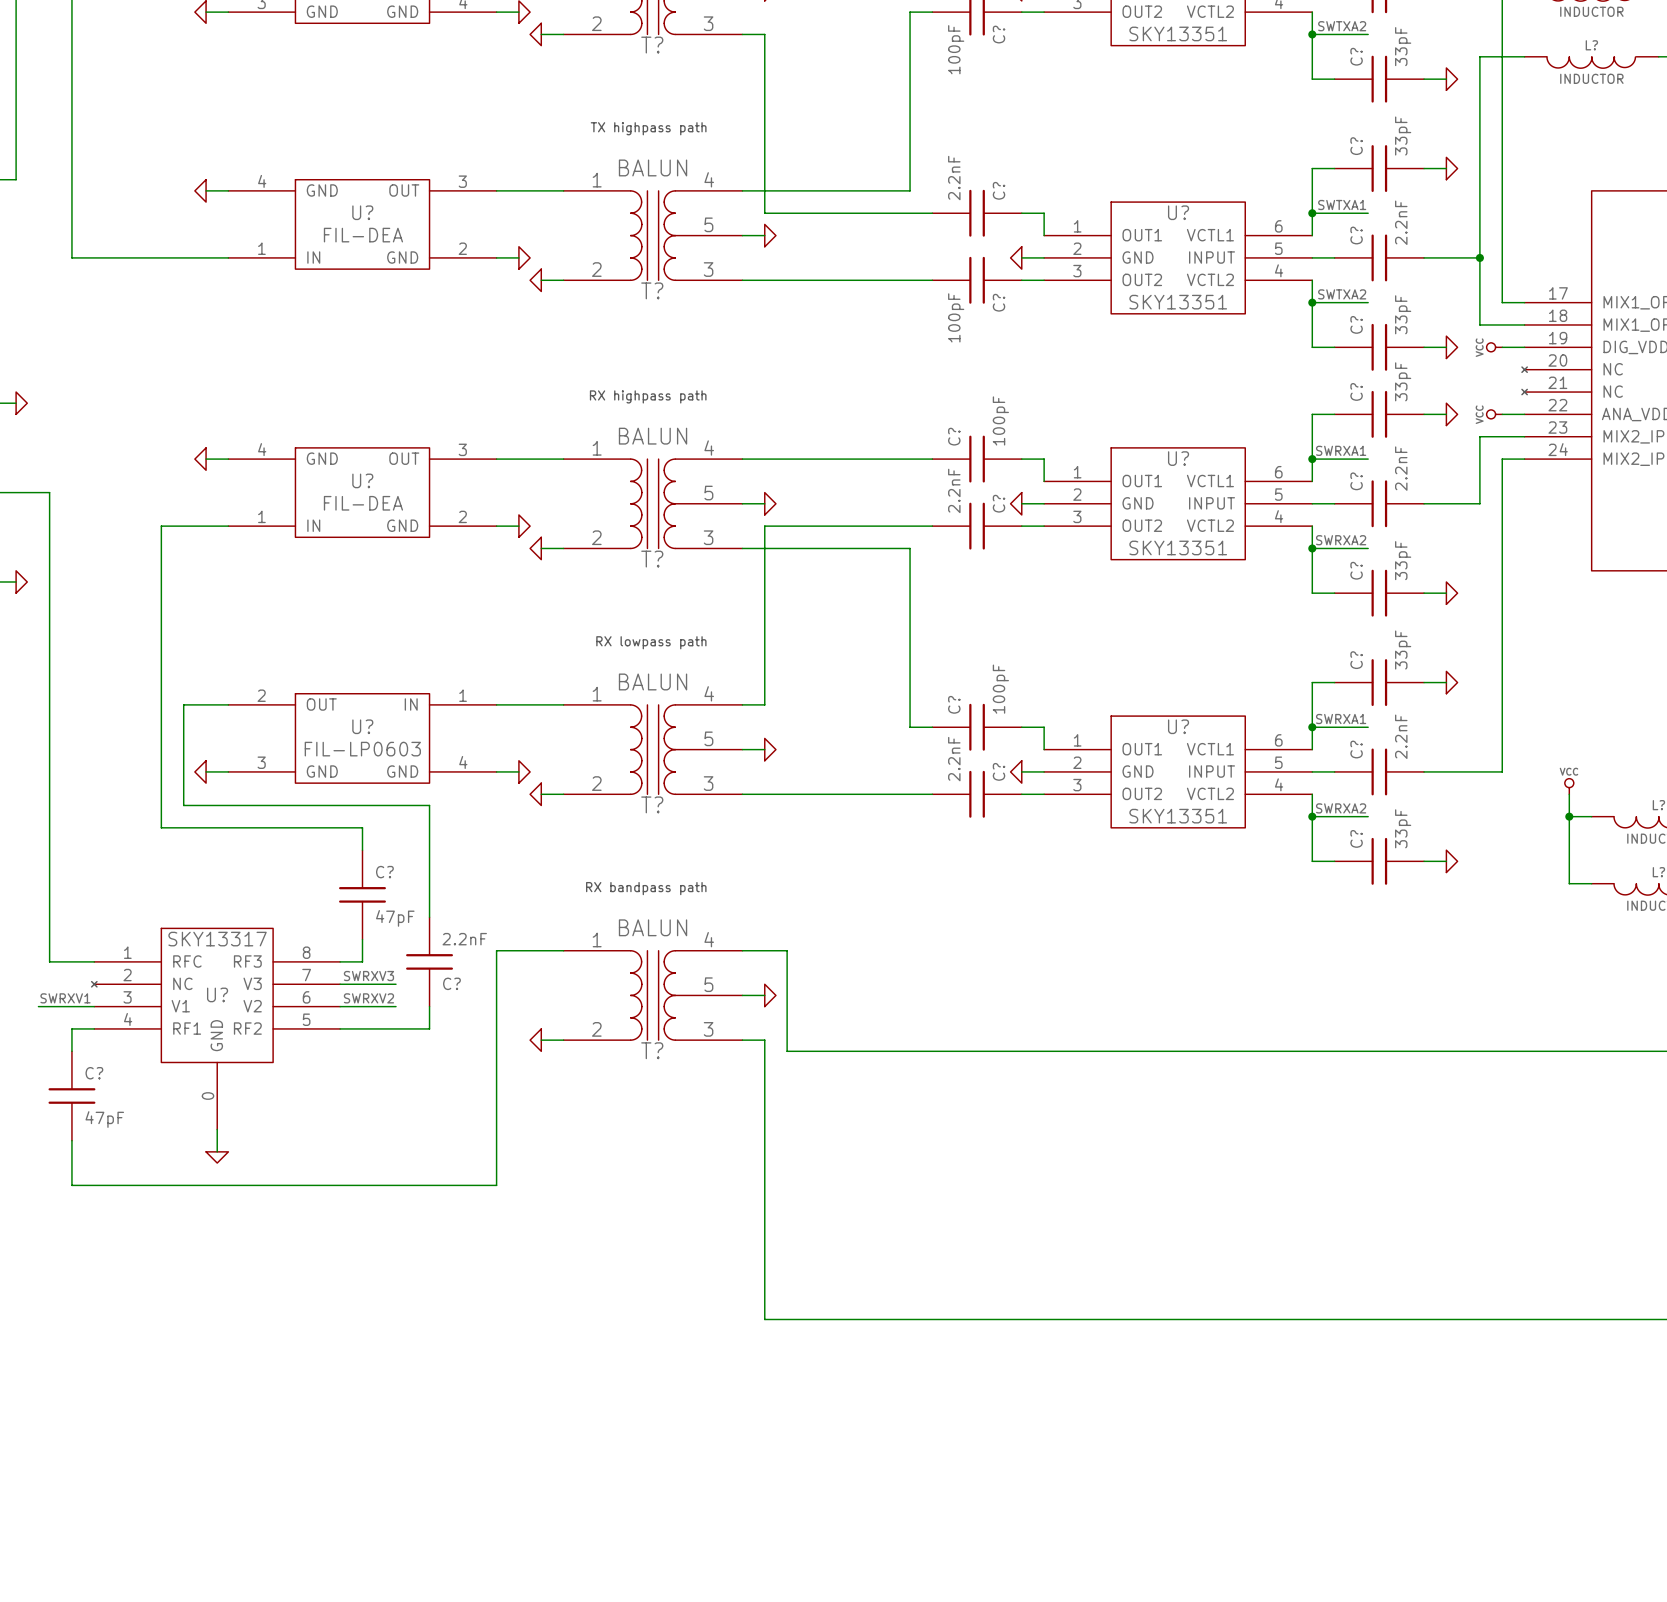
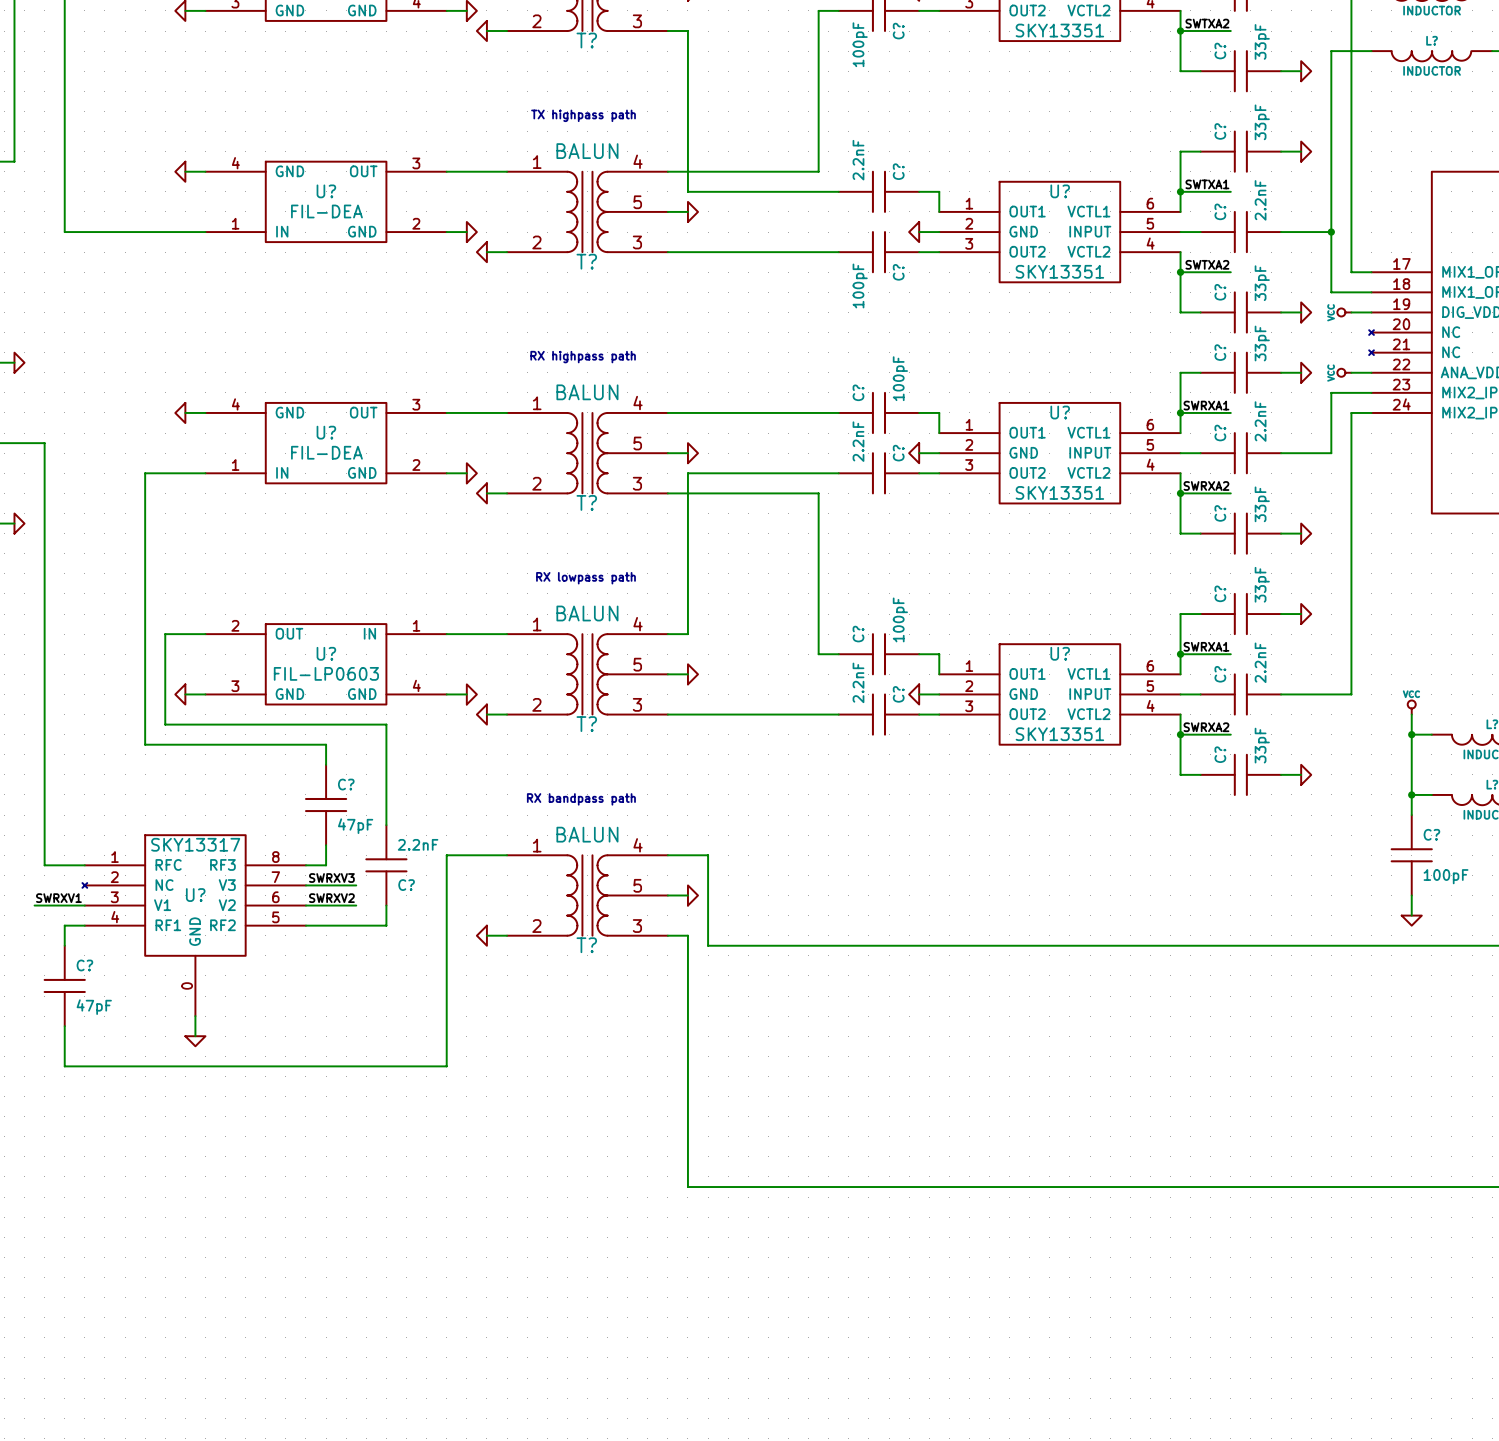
wire: none -> (1411, 794) (1411, 815)
junction: none -> (1411, 794)
C?: none -> 100pF (1411, 855)
wire: none -> (1411, 895) (1411, 915)
power symbol: none -> (1411, 920)

